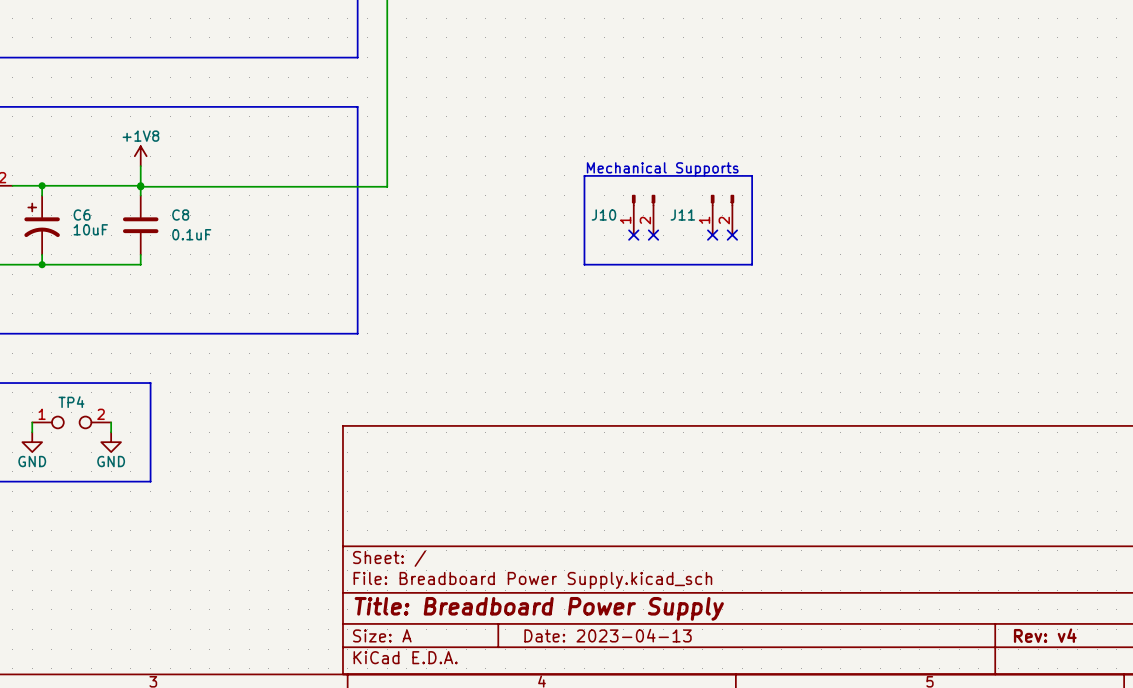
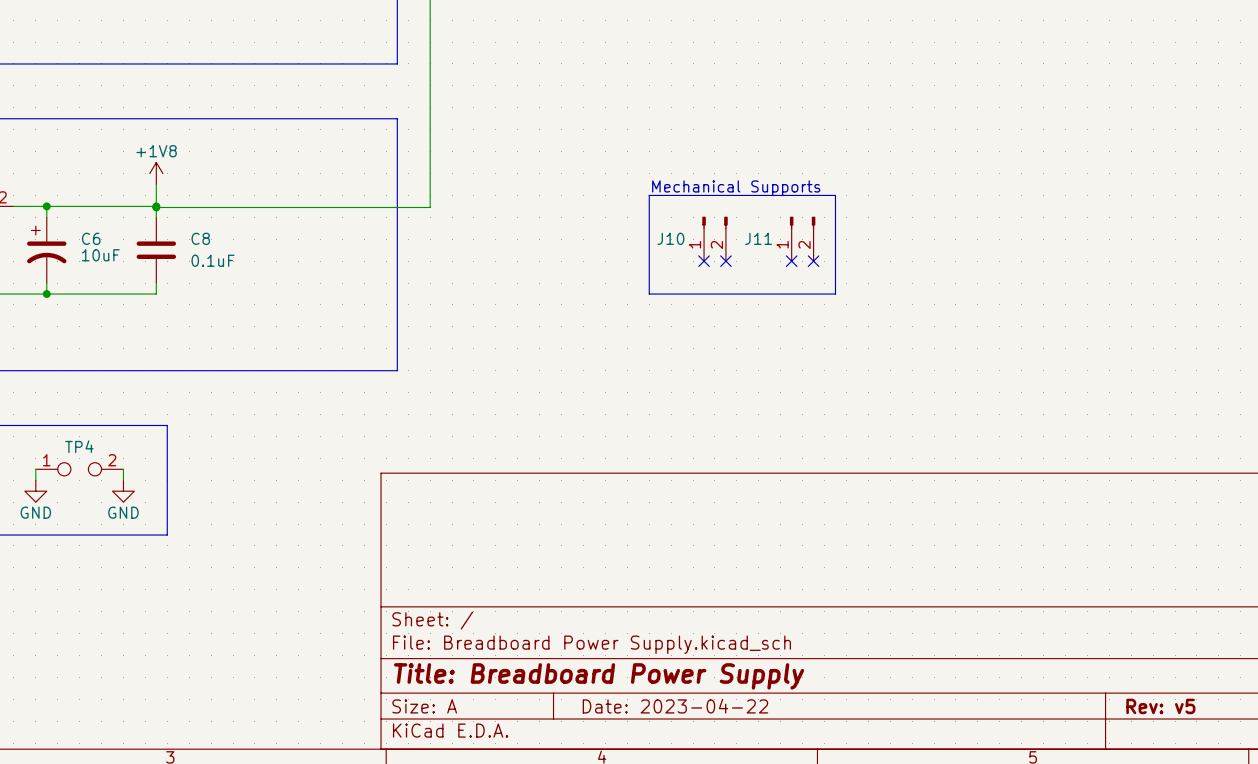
title block: Date: 2023-04-13 (608, 635) -> Date: 2023-04-22 (675, 706)
title block: Rev: v4 (1045, 635) -> Rev: v5 (1160, 706)

